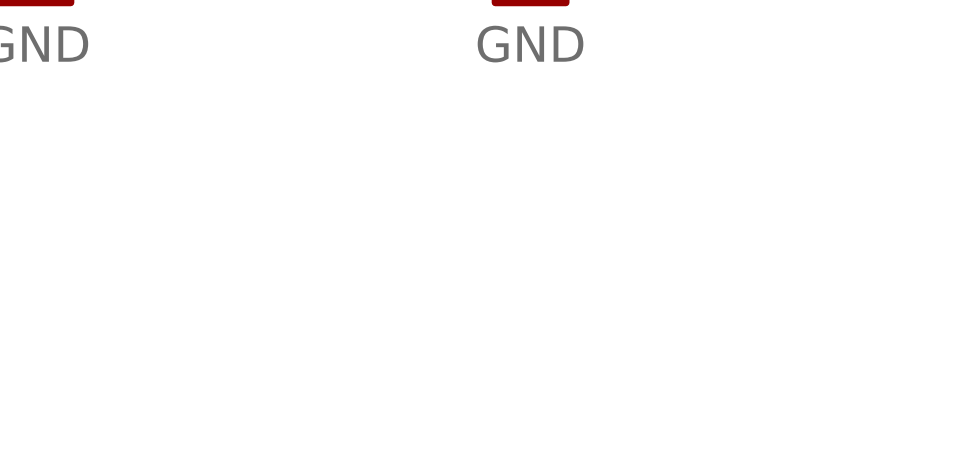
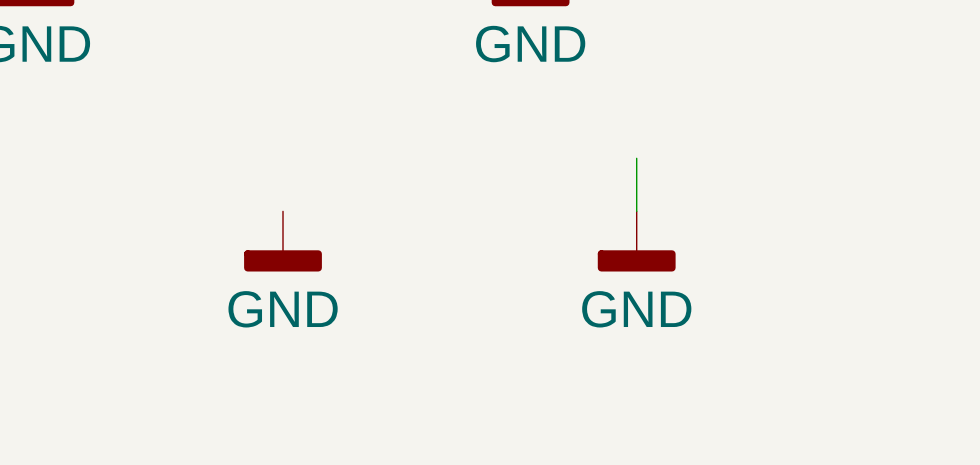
wire: none -> (636, 158) (636, 211)
power symbol: none -> GND (283, 241)
power symbol: none -> GND (636, 241)

